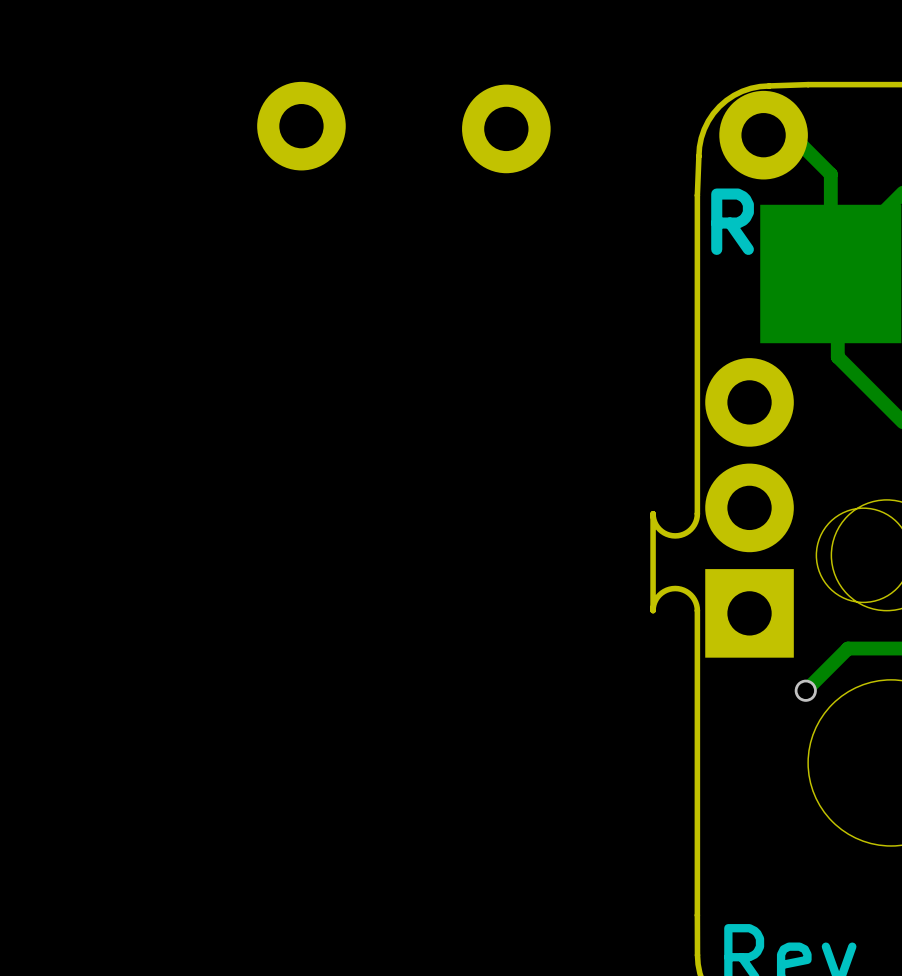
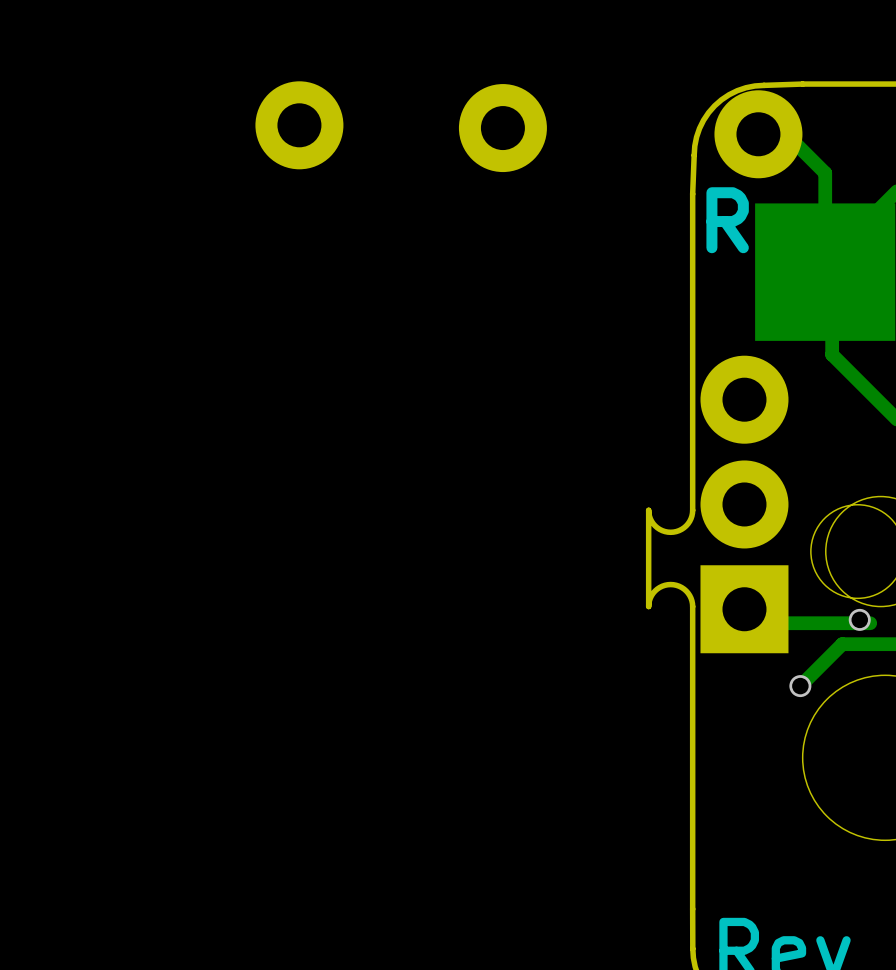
track: none -> (744, 609) (758, 623) (870, 623)
via: none -> (859, 619)

